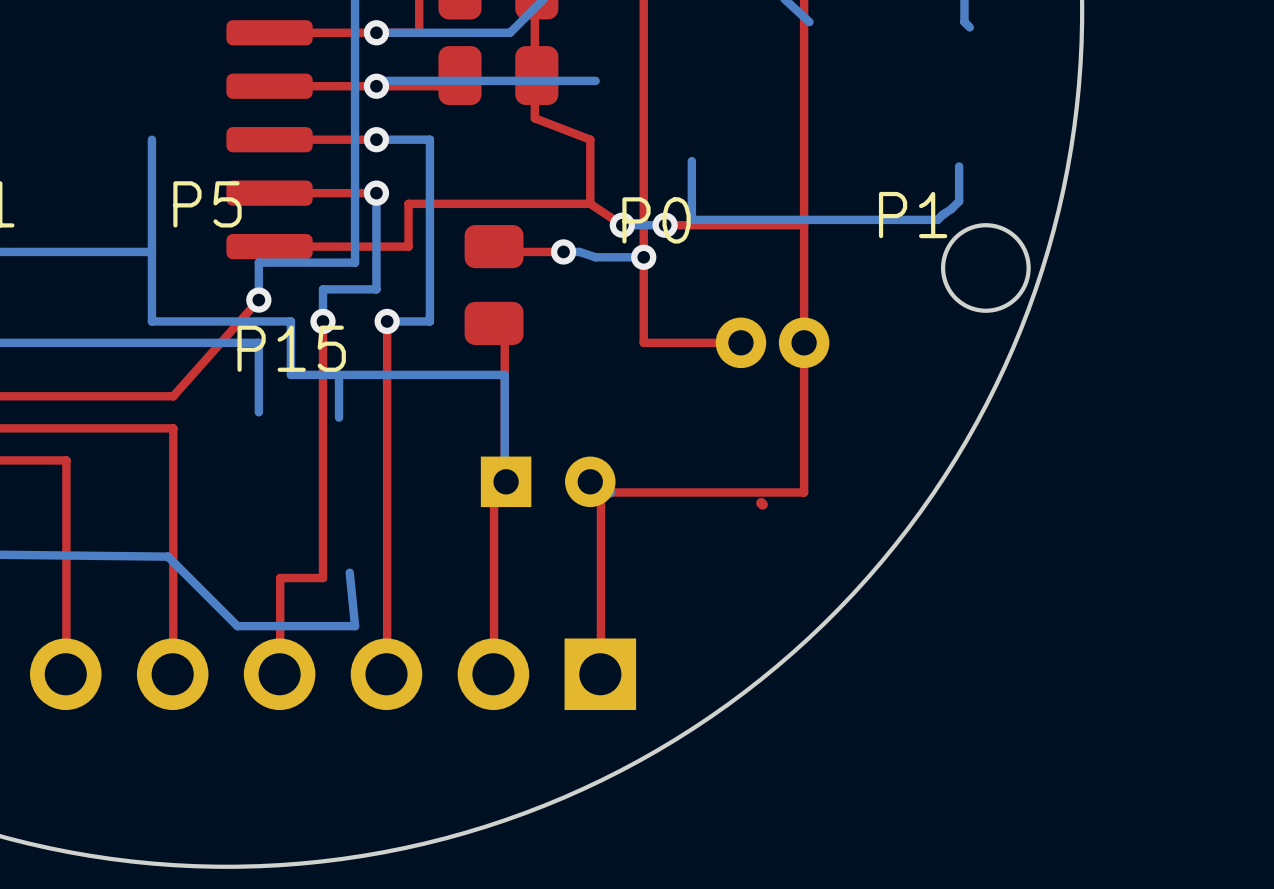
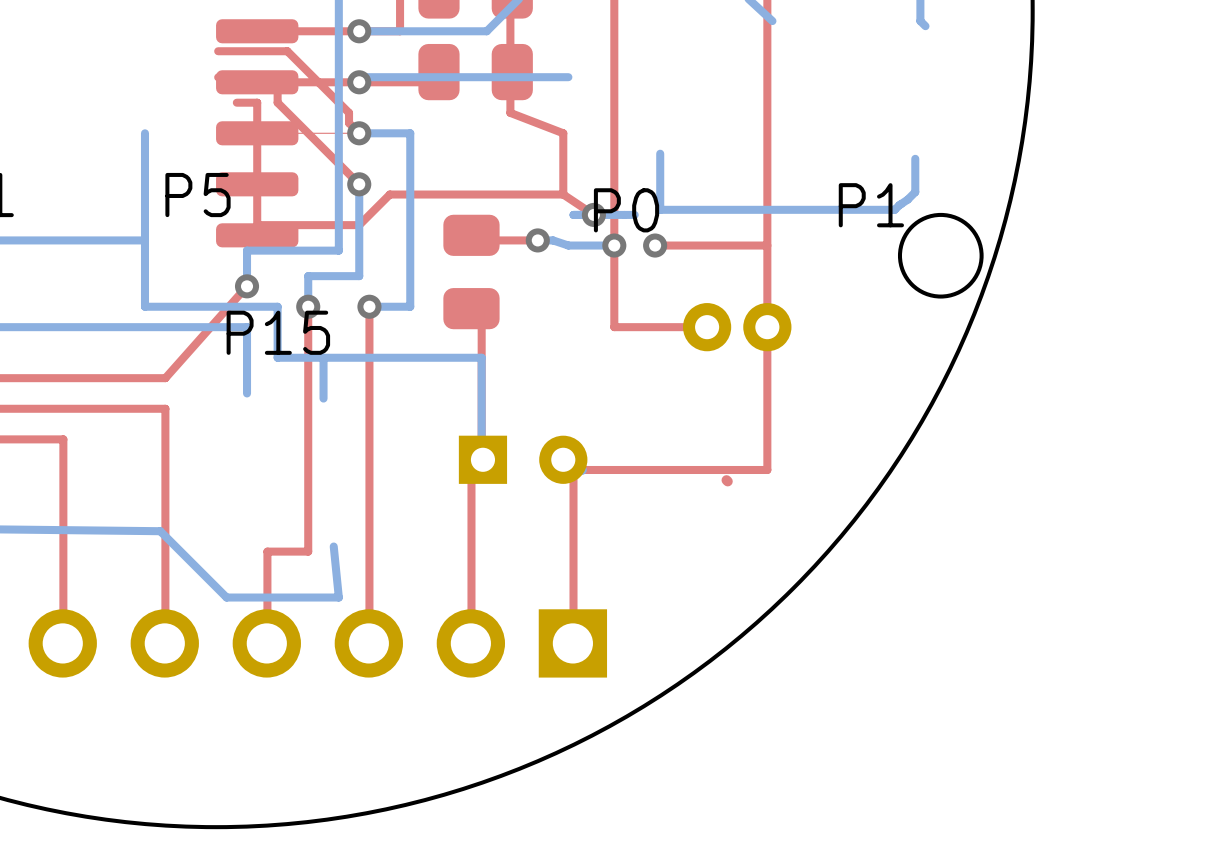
top track: (376, 139) (290, 139) -> (359, 133) (349, 123) (349, 112) (287, 51) (218, 51)
top track: (376, 193) (280, 193) -> (359, 184) (277, 102) (277, 82) (272, 77) (218, 77)
top track: (408, 203) (408, 246) (290, 246) -> (389, 194) (359, 225) (257, 225) (257, 102) (236, 102)
bottom track: none -> (593, 214) (573, 214)
via position: (665, 225) -> (655, 245)
top track: (804, 225) (665, 225) -> none
top track: none -> (767, 245) (655, 245)

